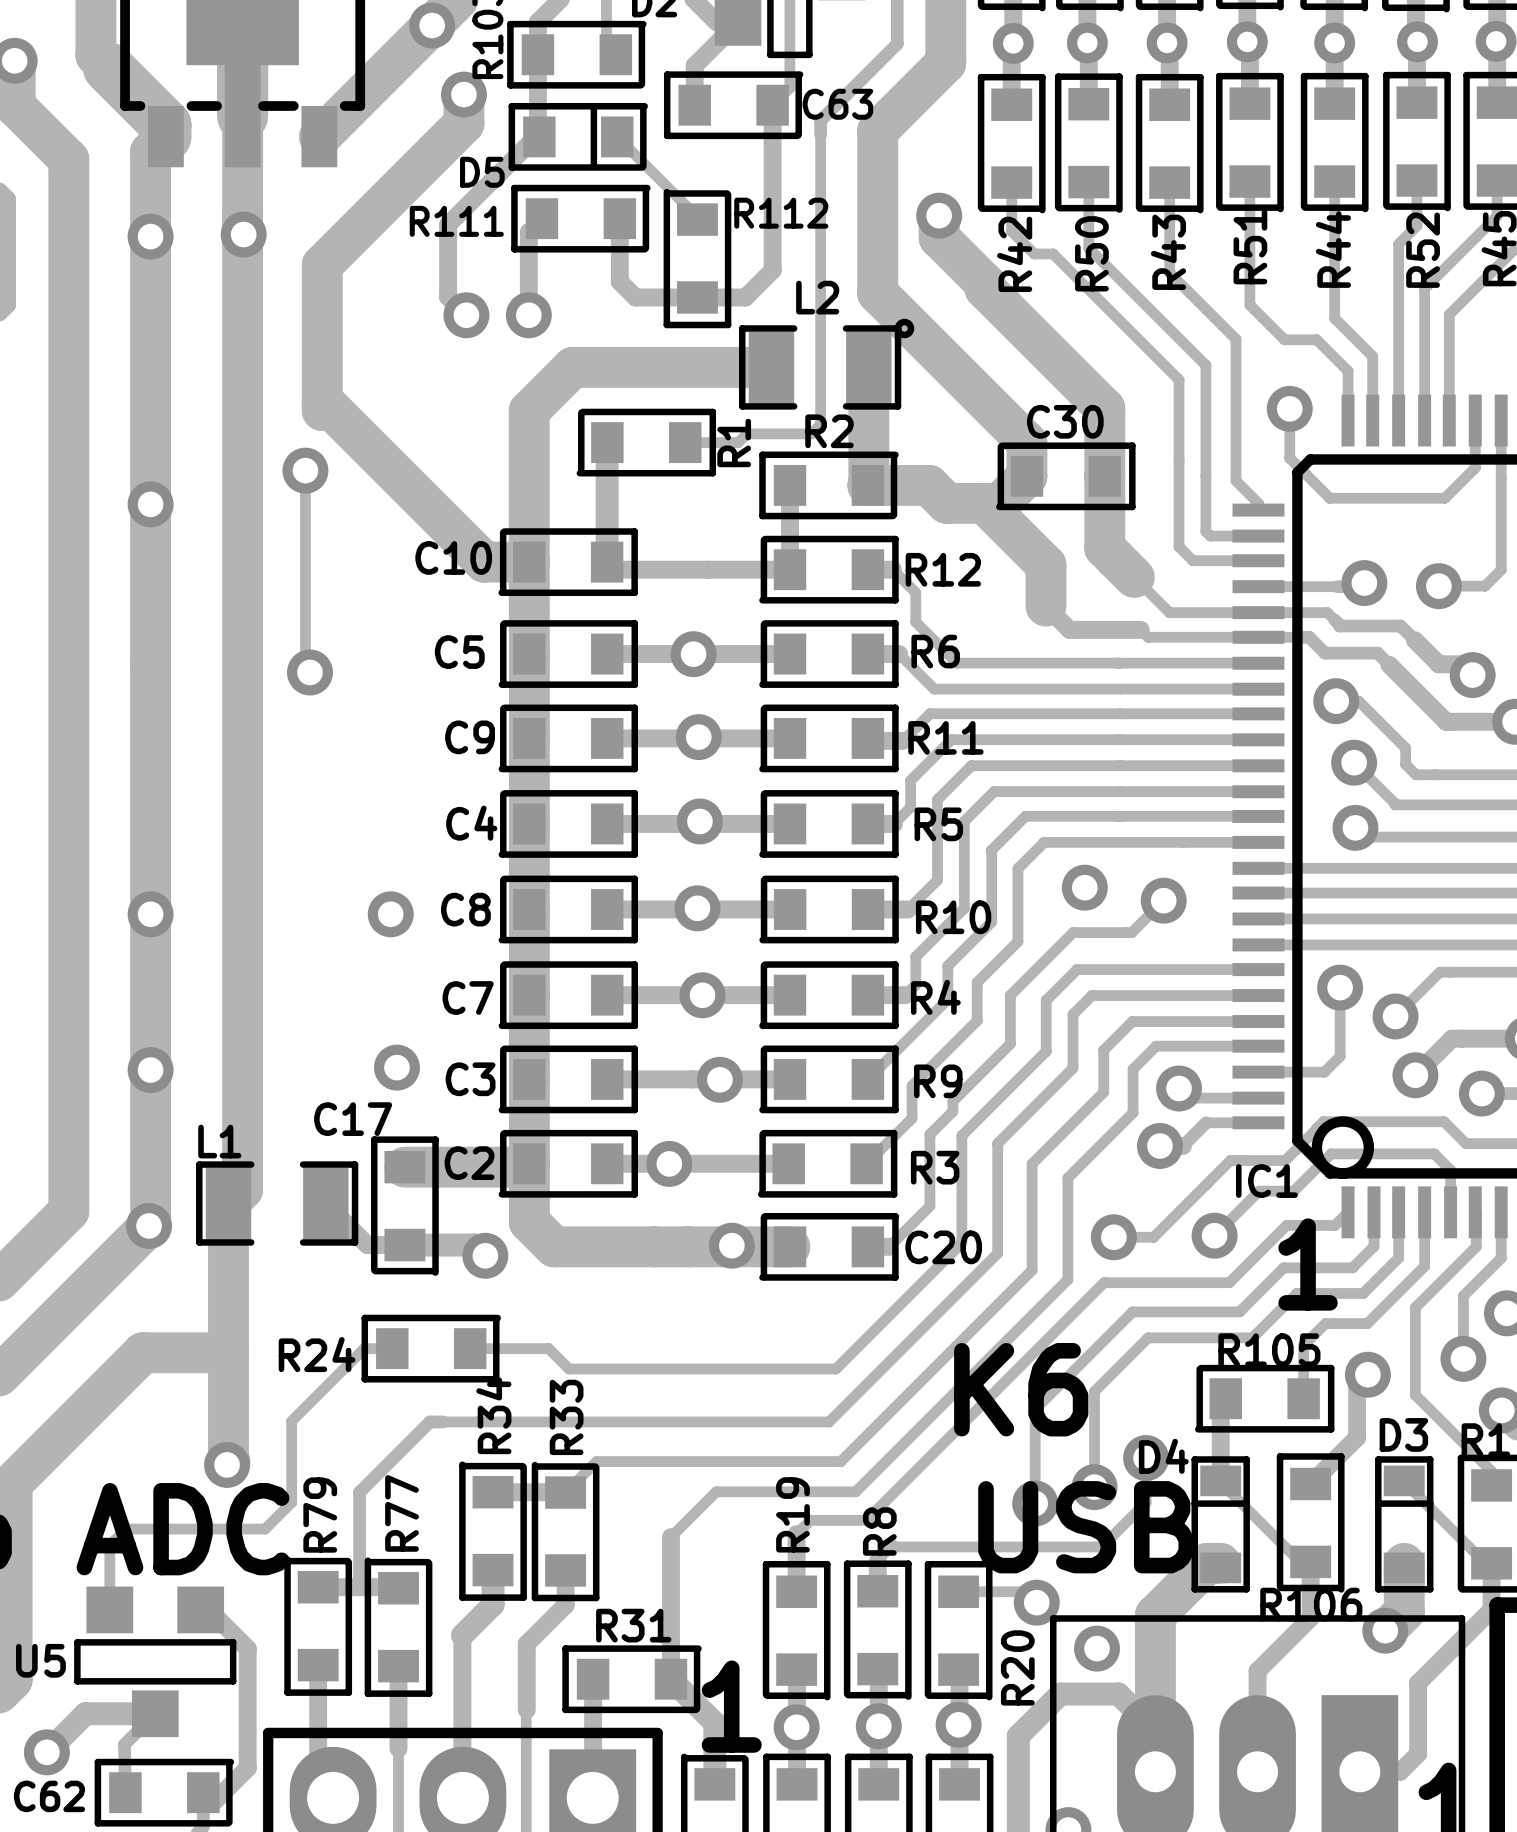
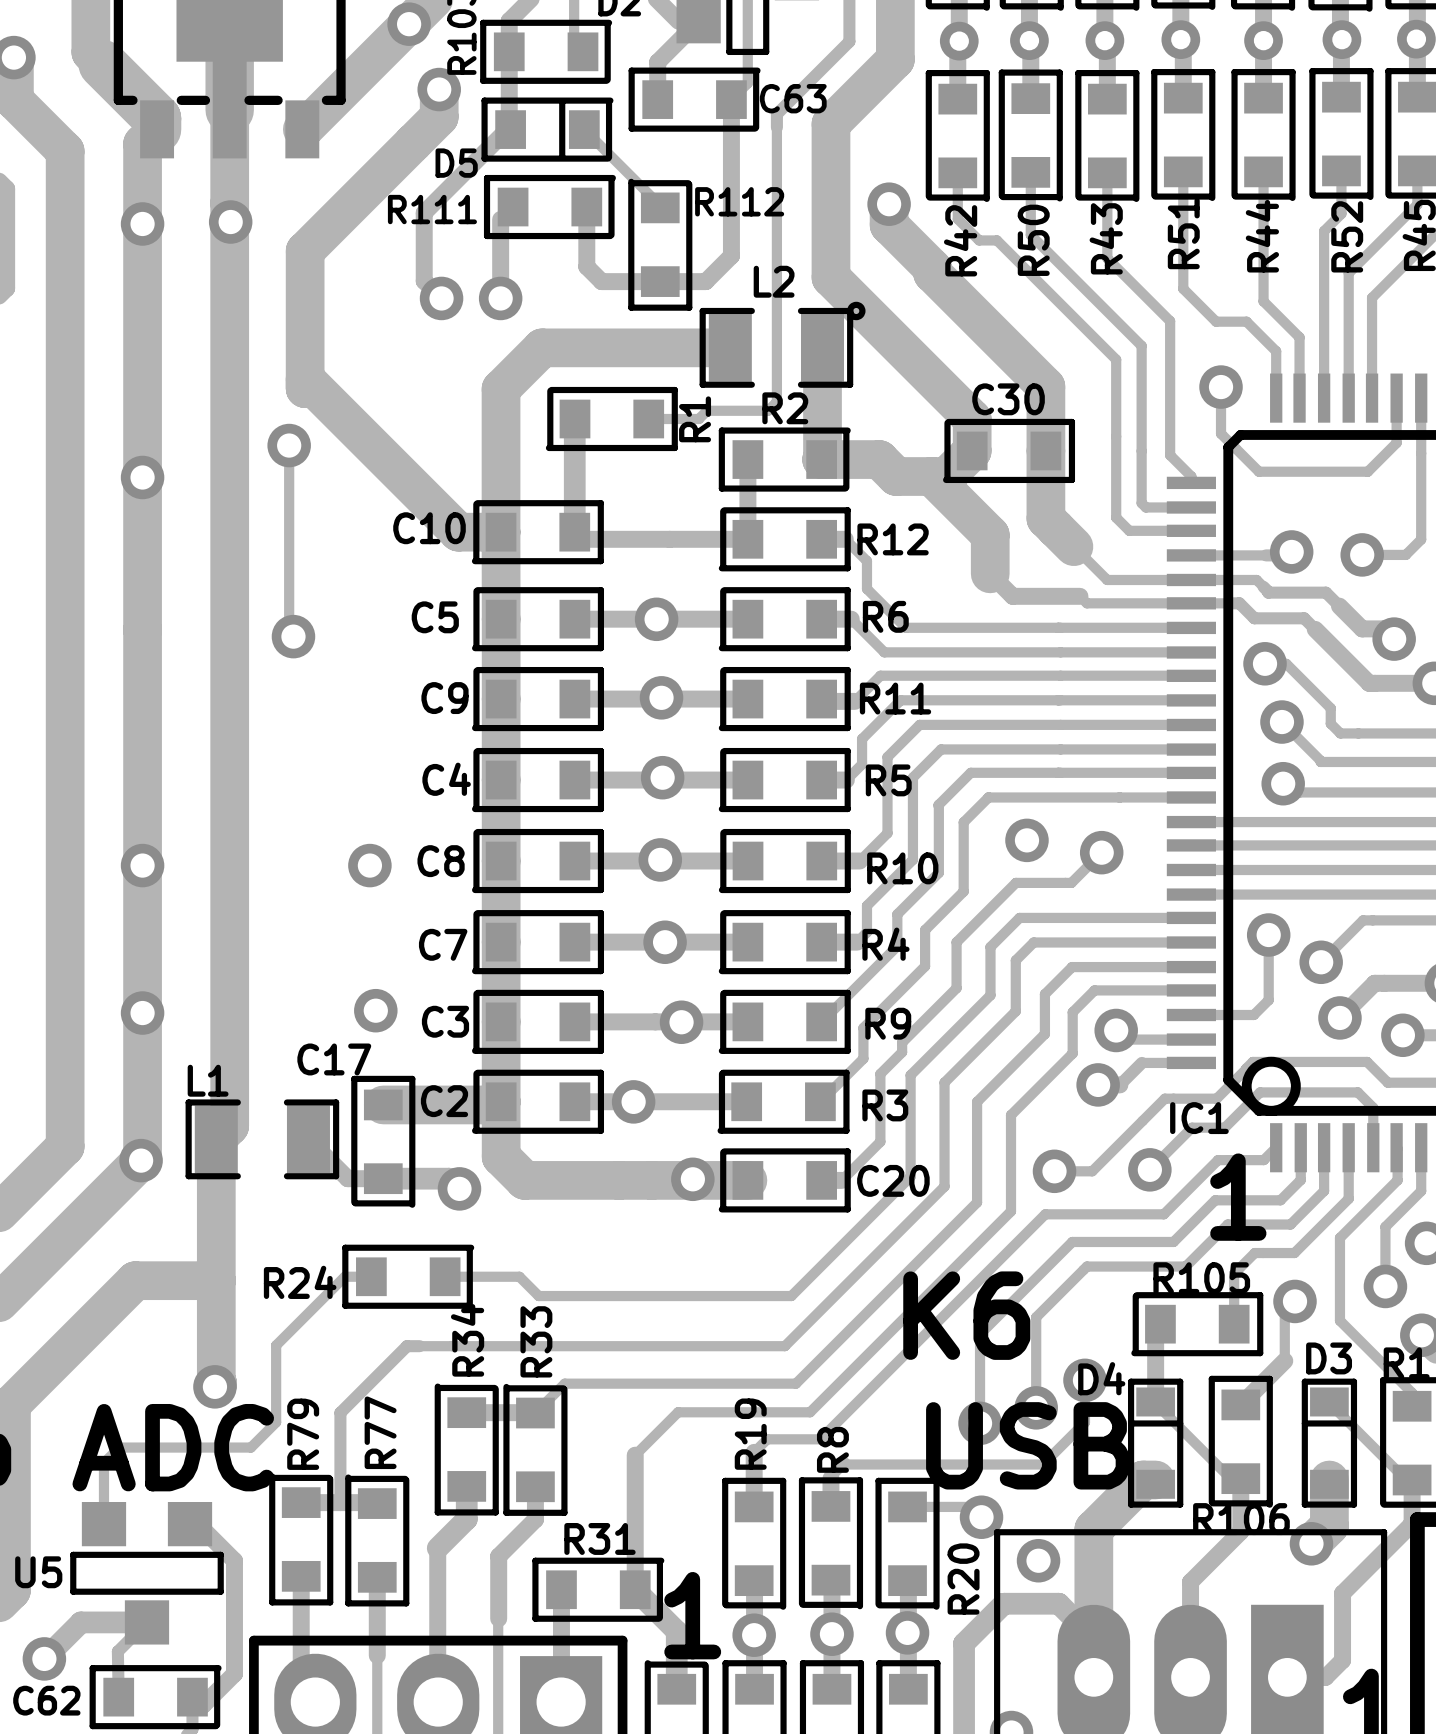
track width: thick (1367, 1374) (1357, 1385) (1357, 1437) -> thin (1294, 1301) (1284, 1311) (1284, 1360)

